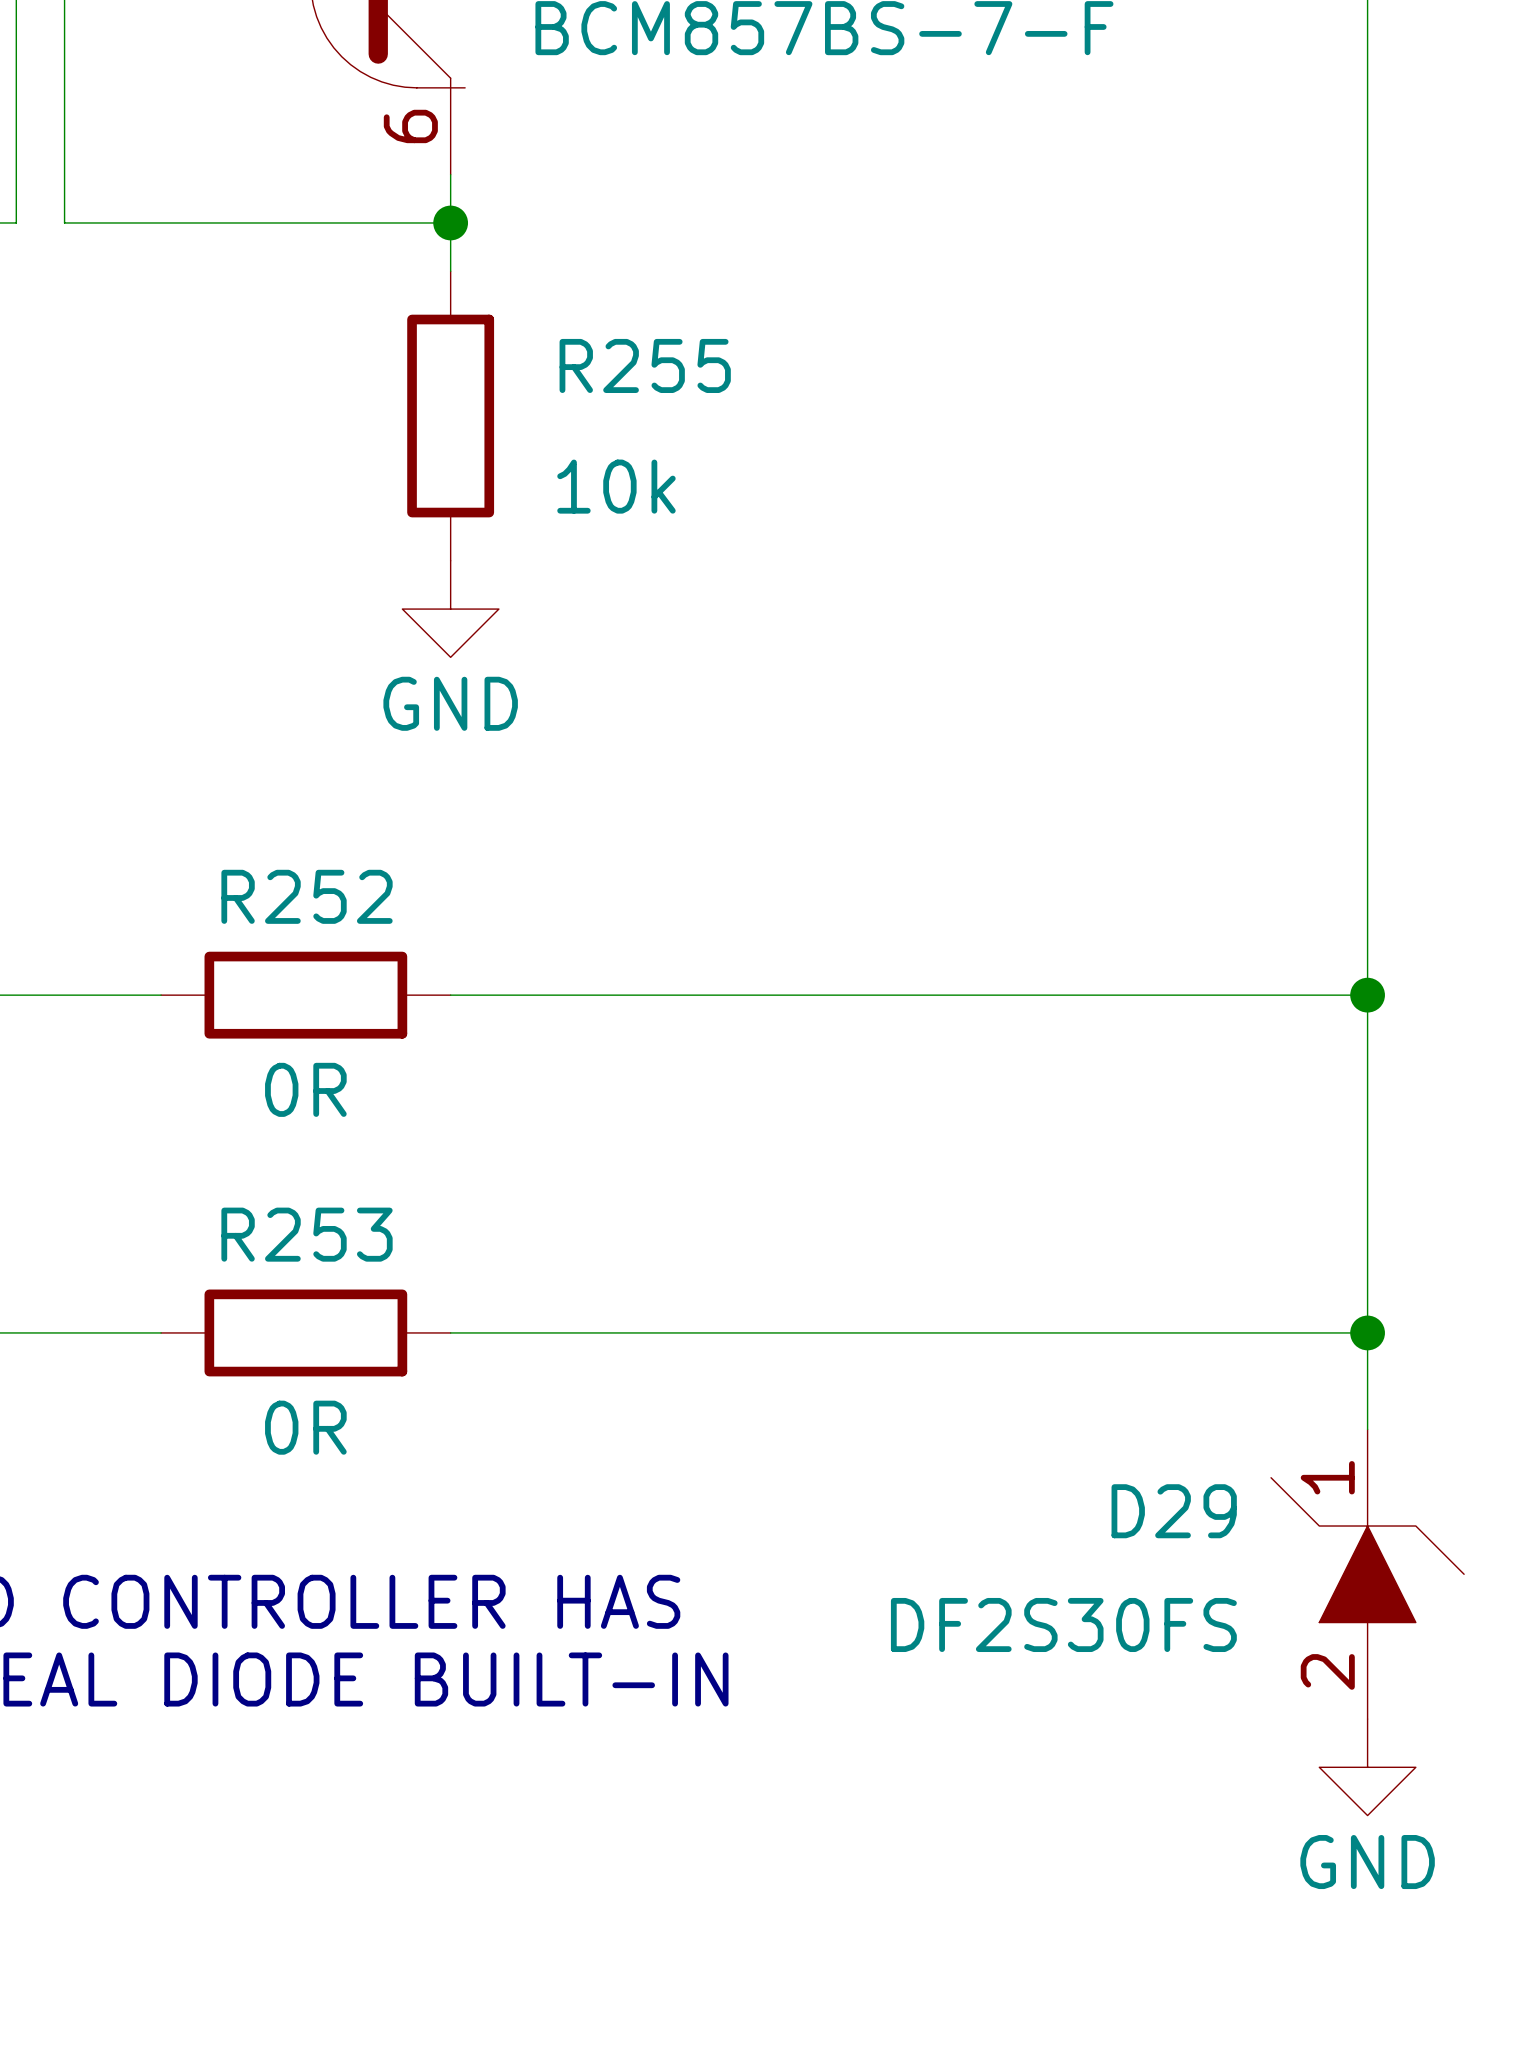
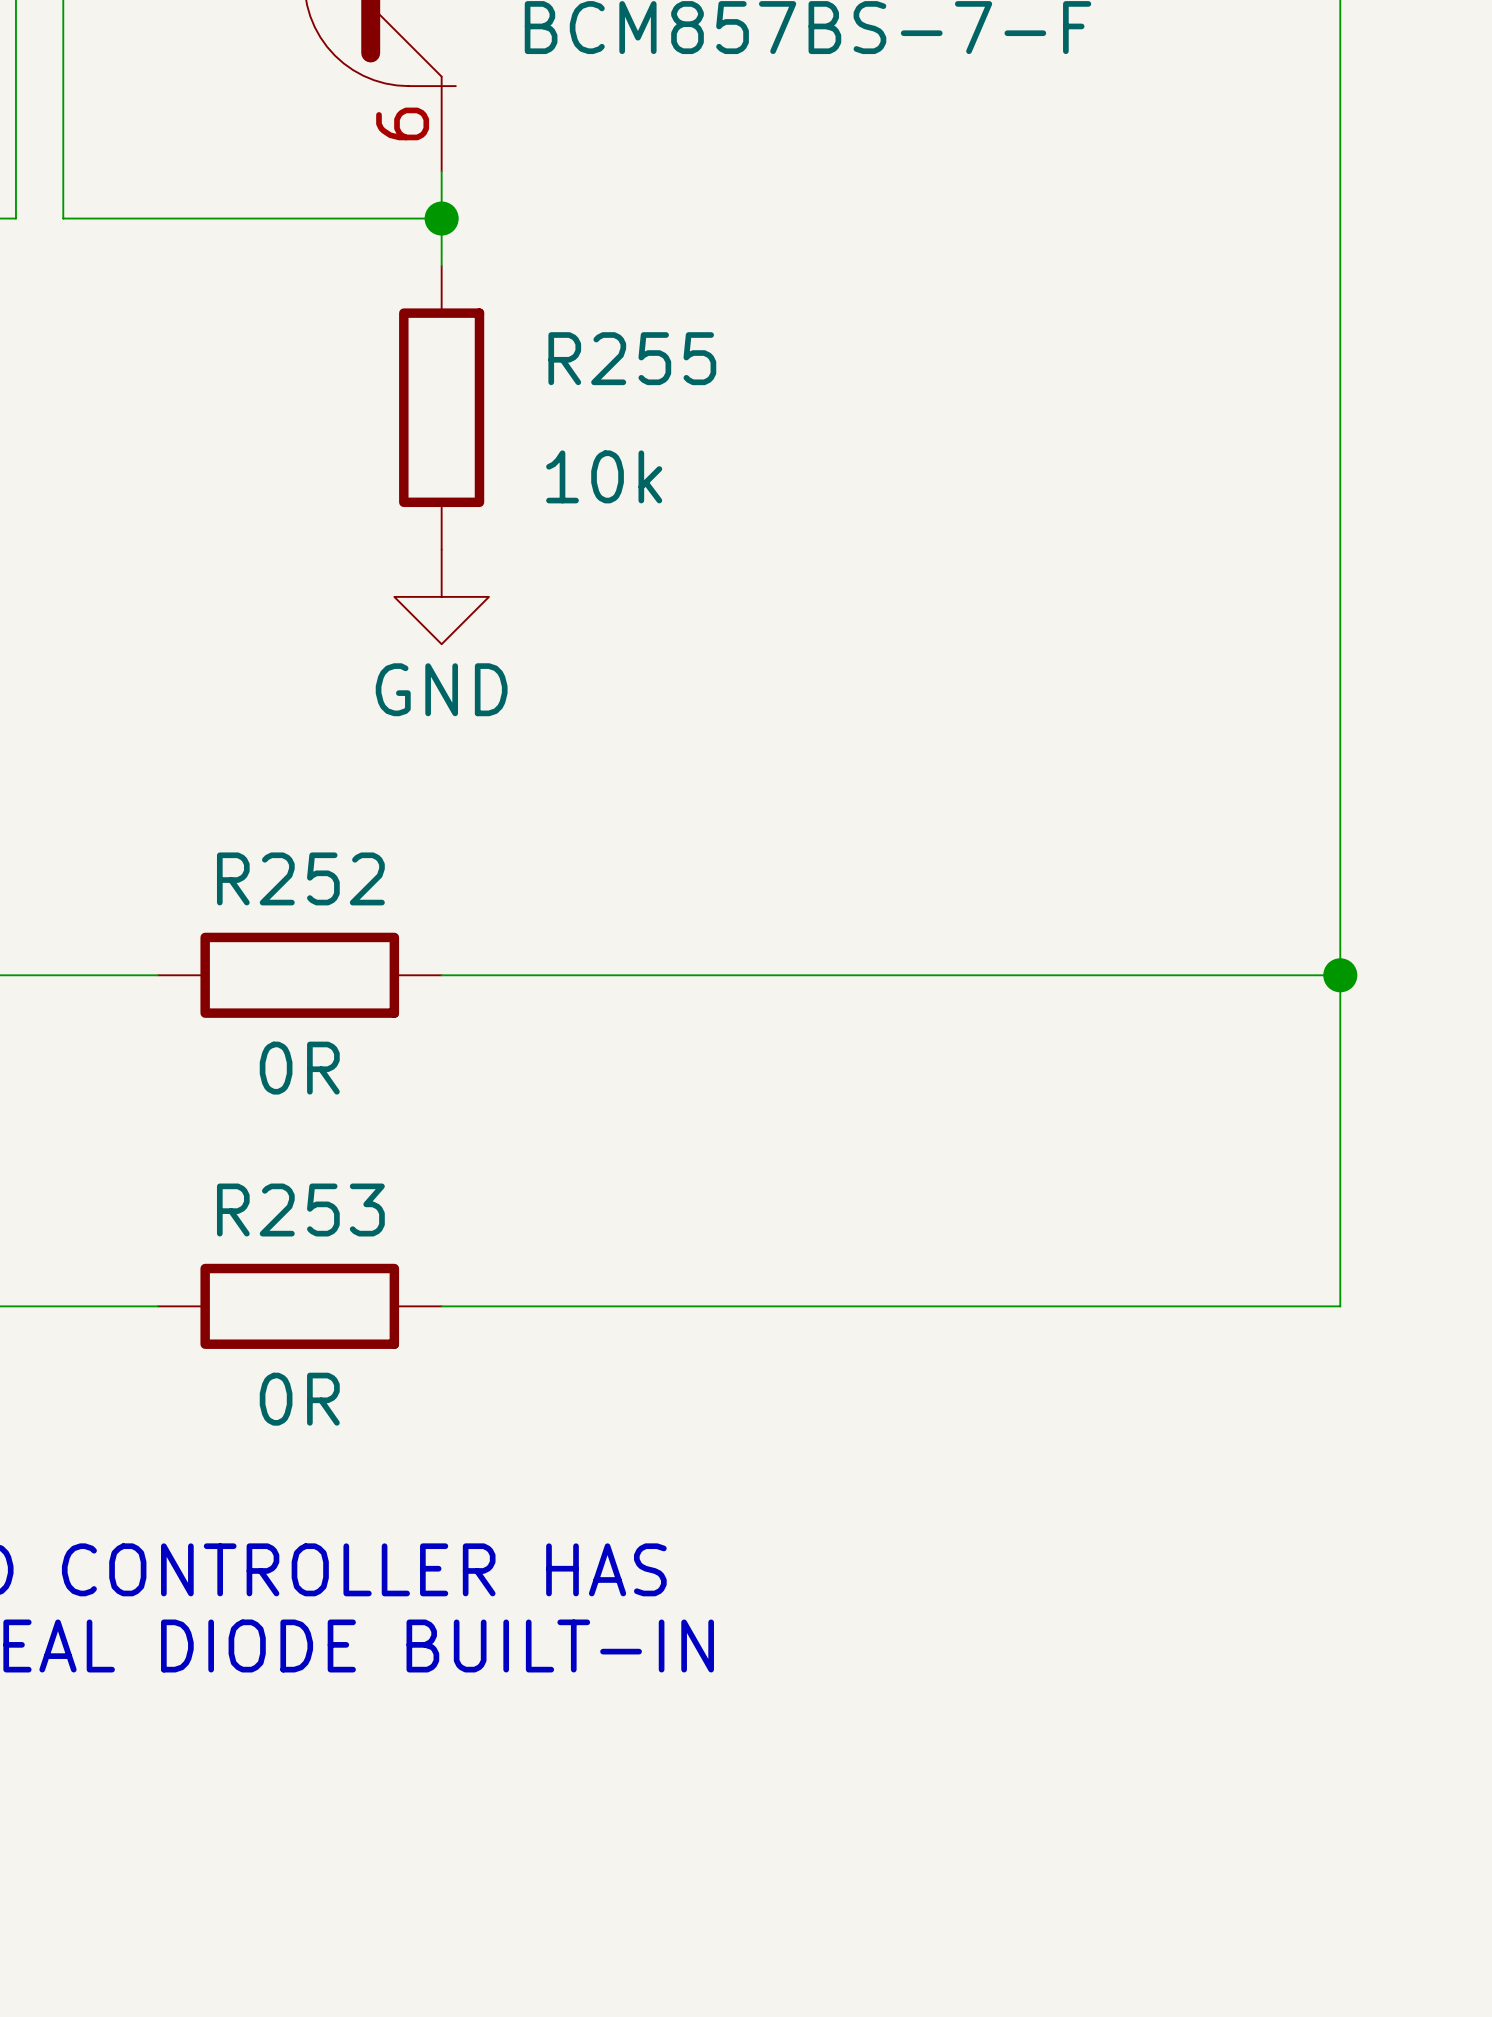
wire: (1367, 1332) (1367, 1429) -> none
junction: (1367, 1332) -> none
D29: DF2S30FS (1367, 1574) -> none
power symbol: GND (1367, 1767) -> none

